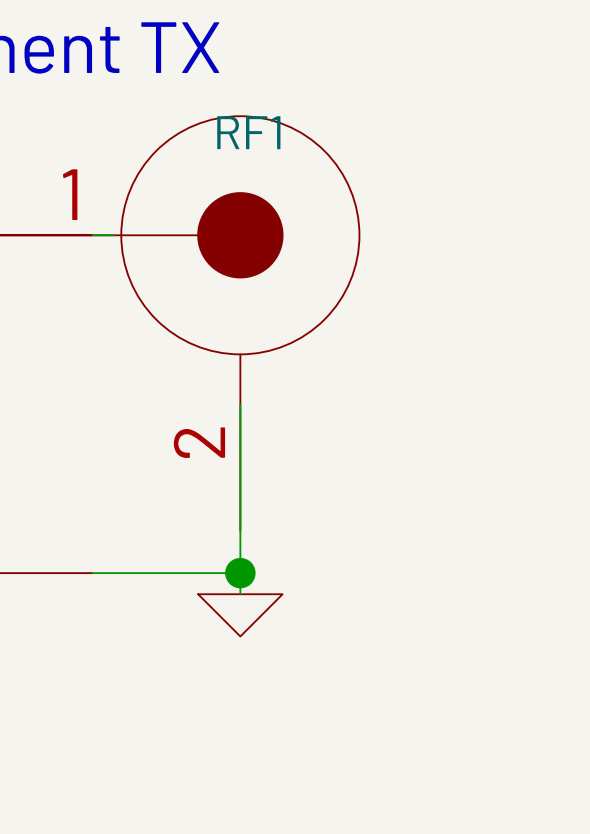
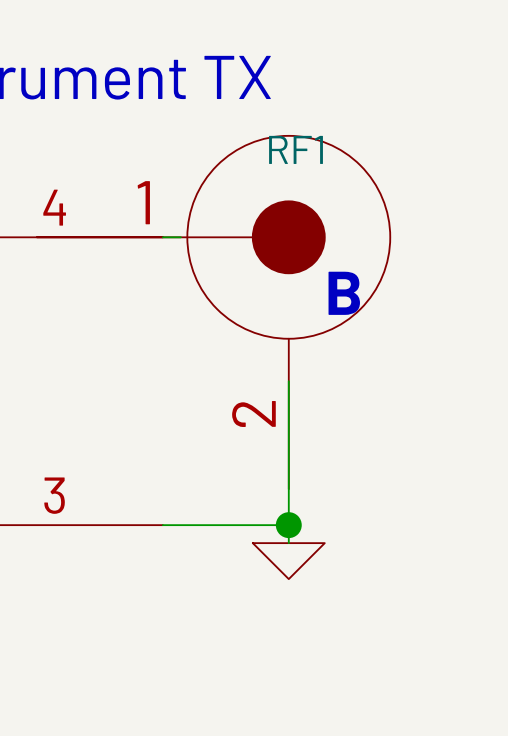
text: none -> B (344, 293)

